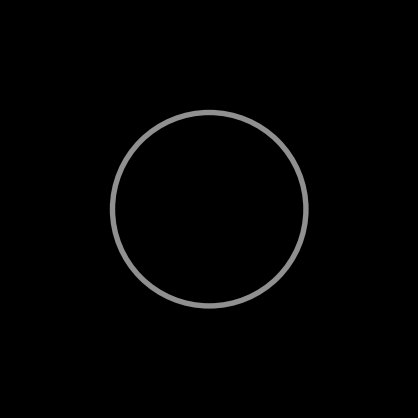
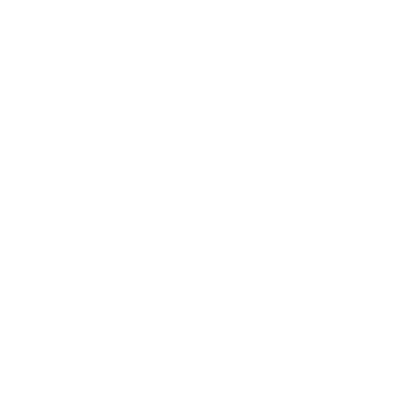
drawing: [109, 109, 309, 309] -> none

